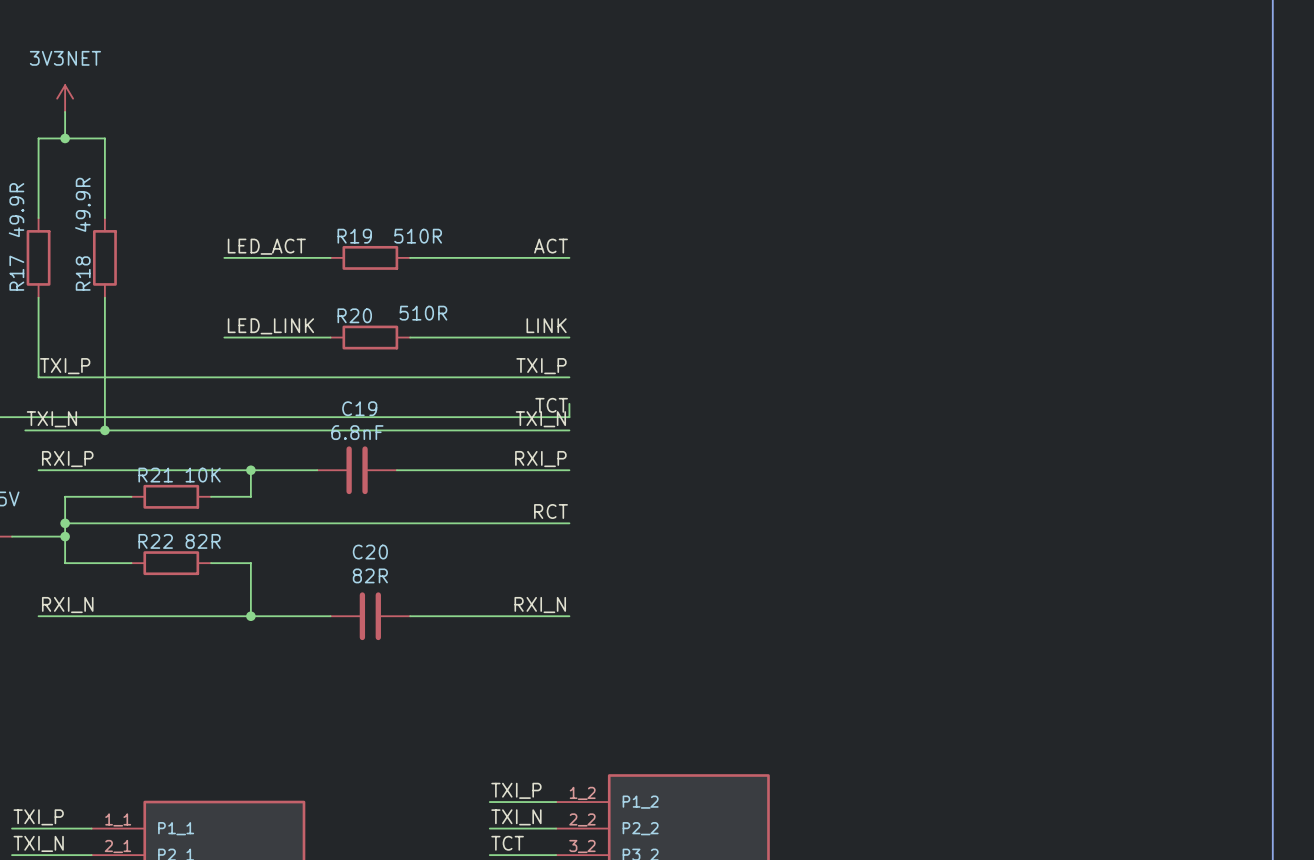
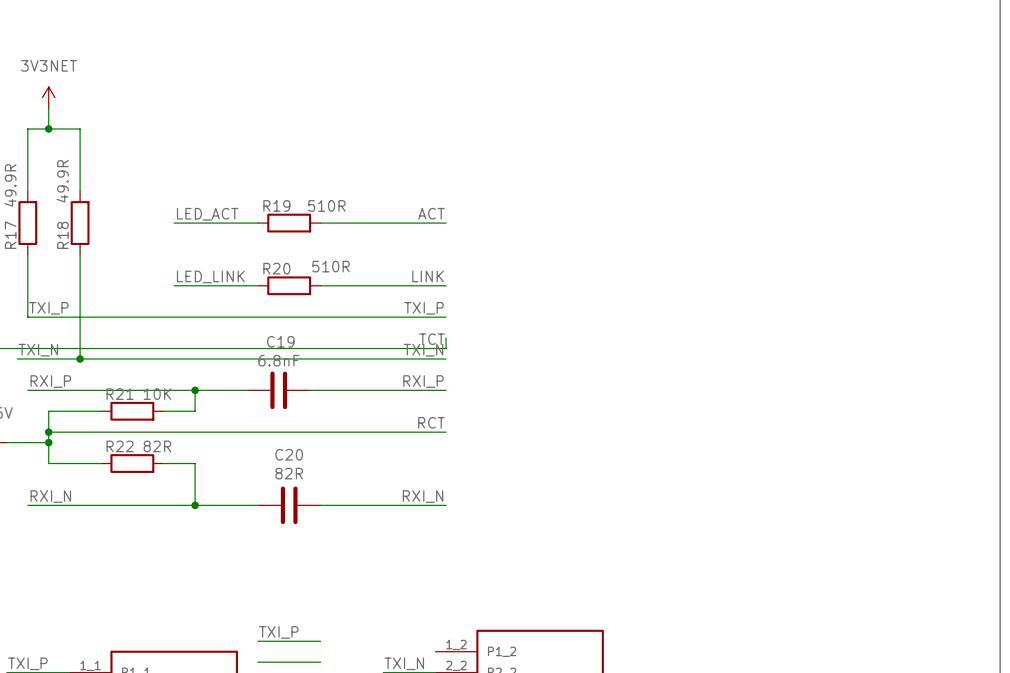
wire: none -> (257, 641) (320, 641)
label position: TXI_P (516, 790) -> TXI_P (278, 632)
wire: (489, 802) (556, 802) -> none
wire: none -> (257, 662) (320, 662)

